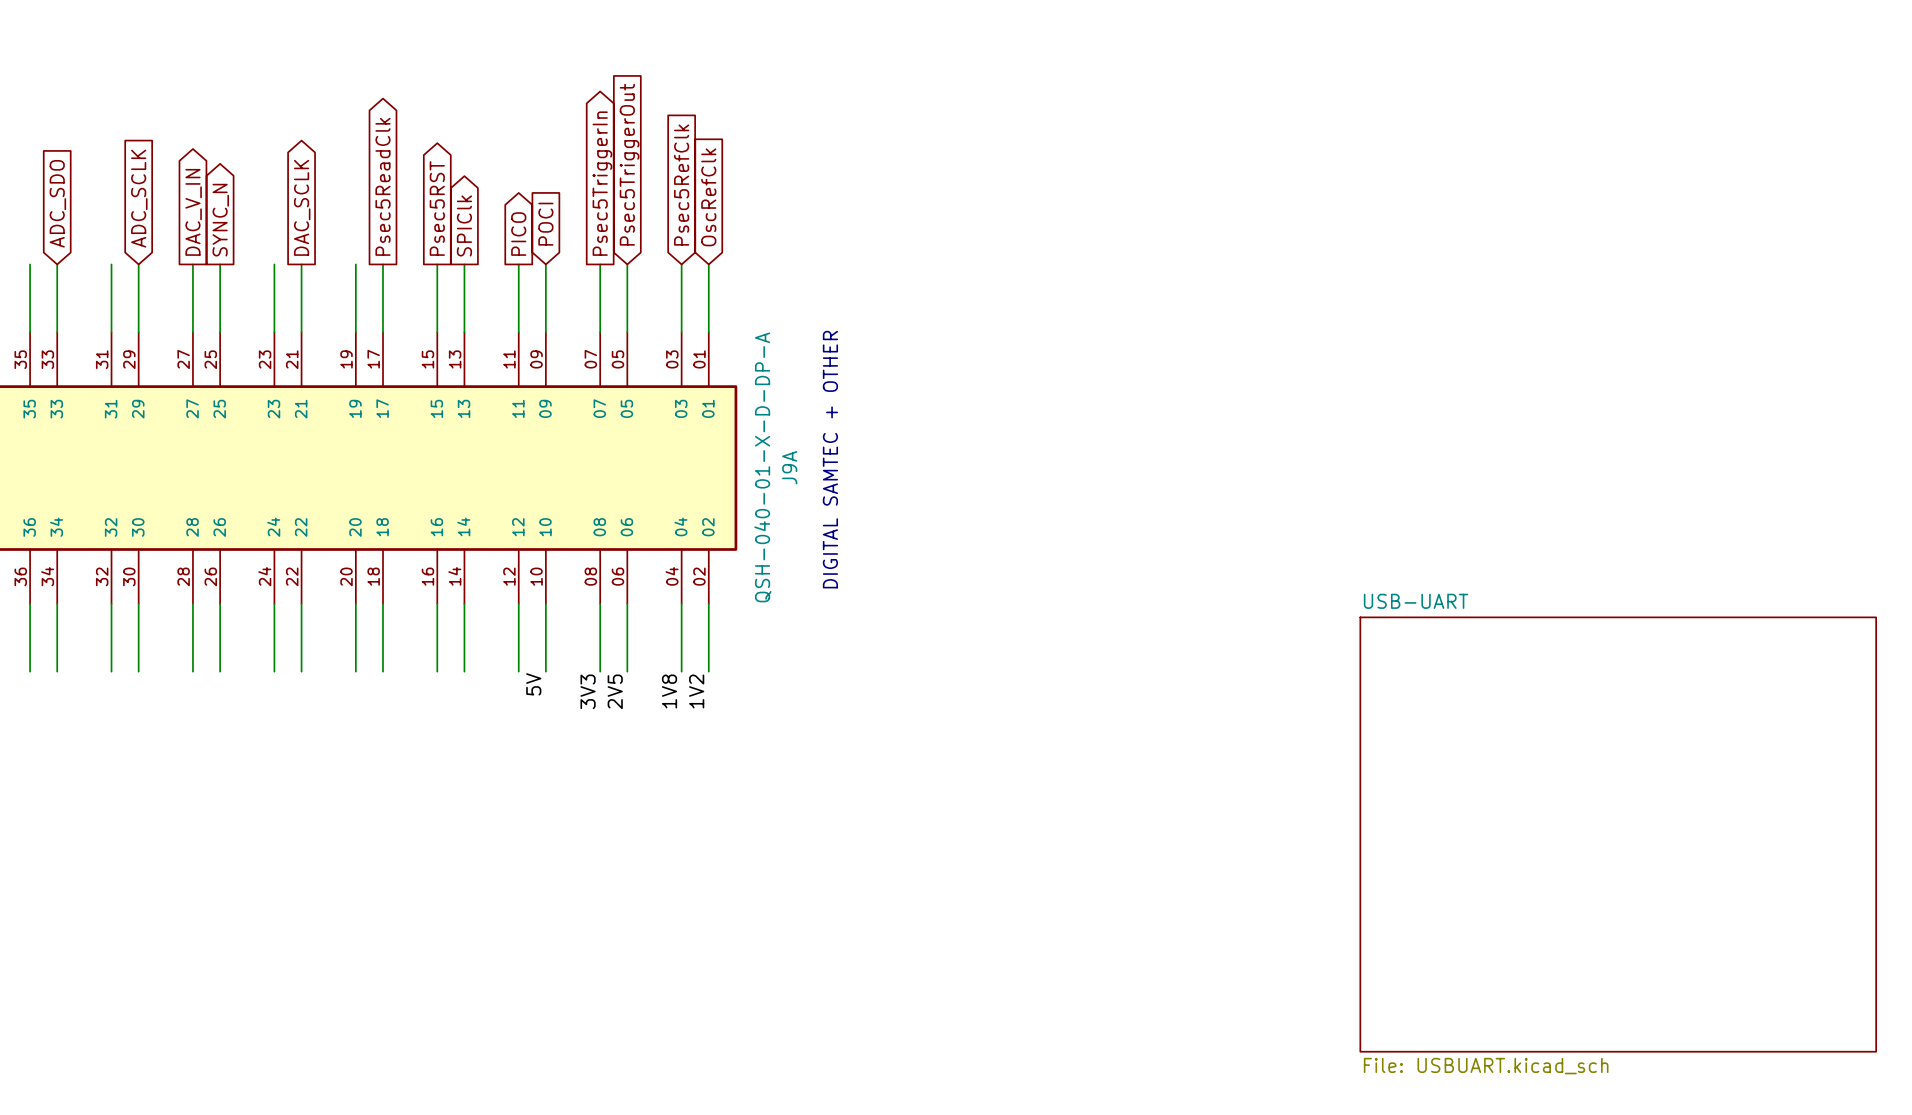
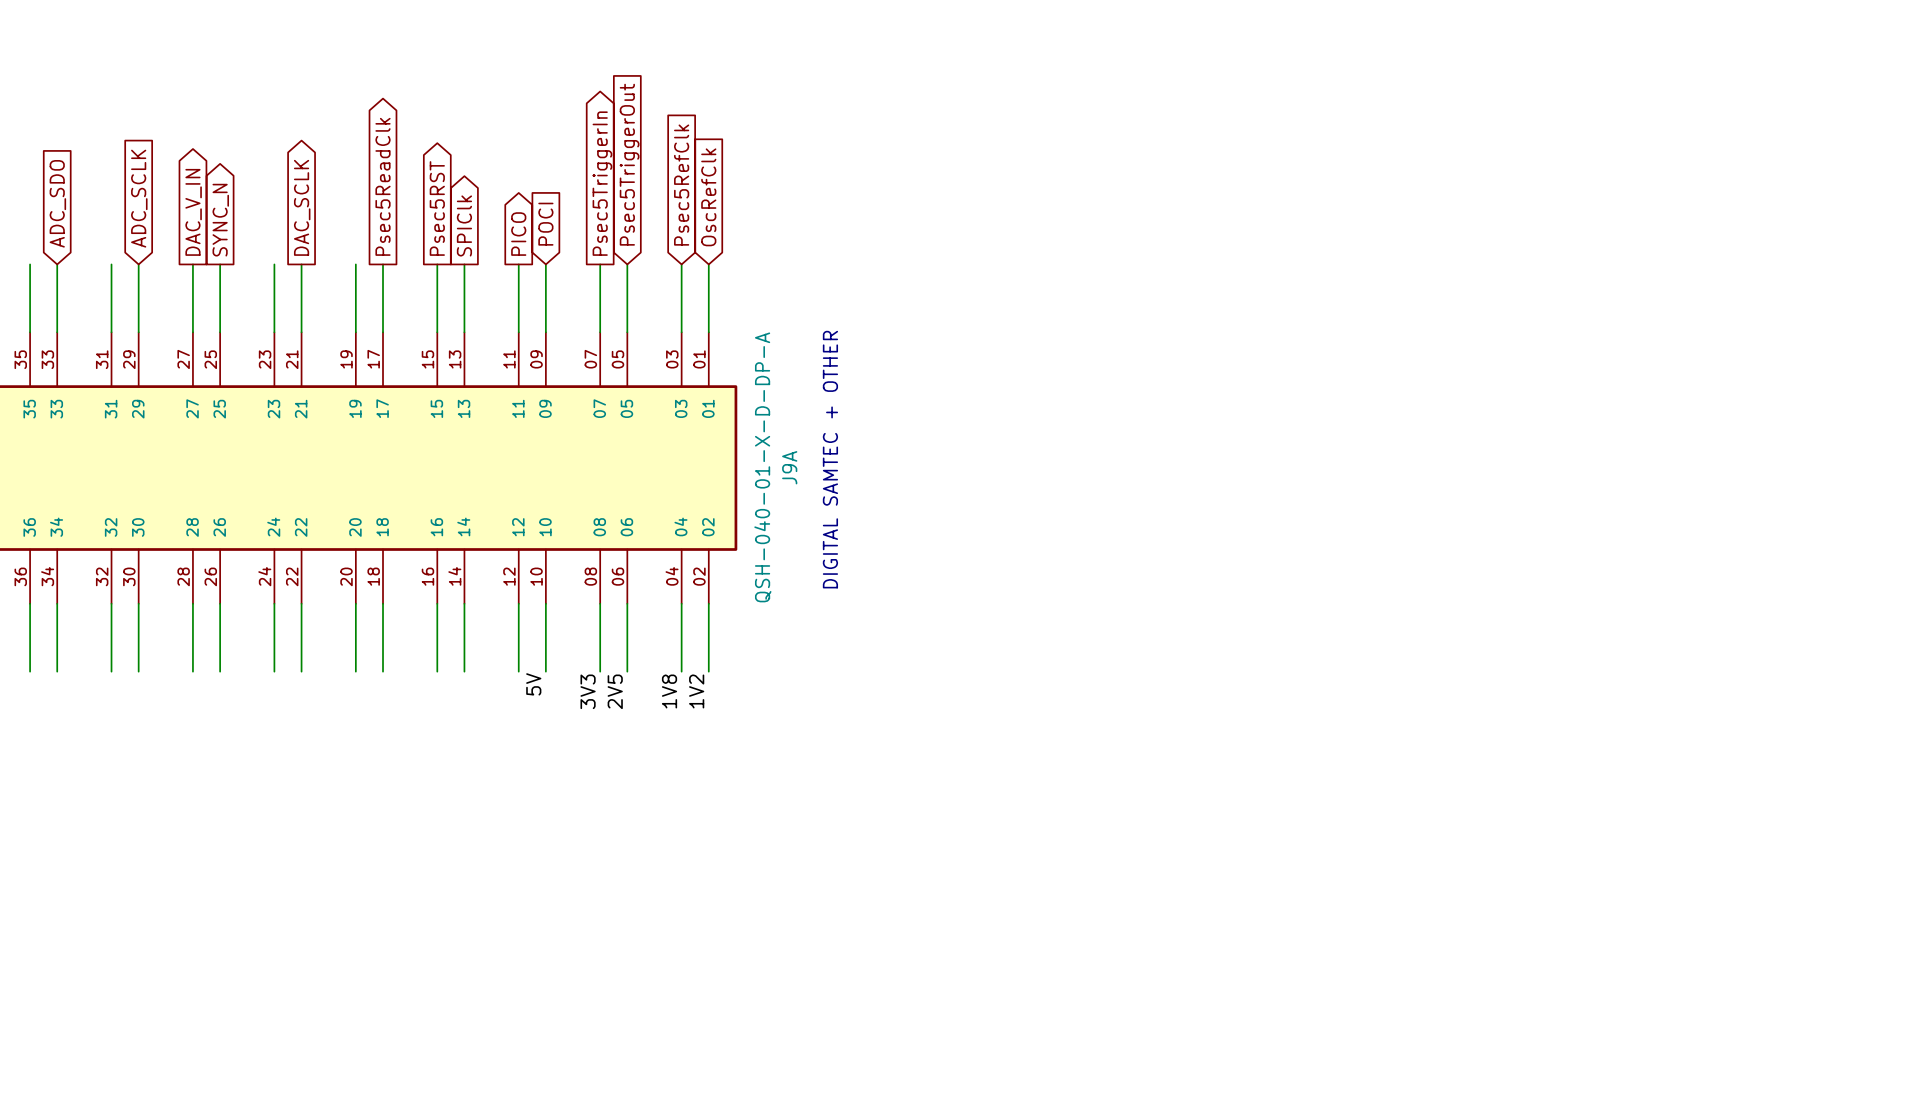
sheet USB-UART: File: USBUART.kicad_sch (1618, 834) -> none

